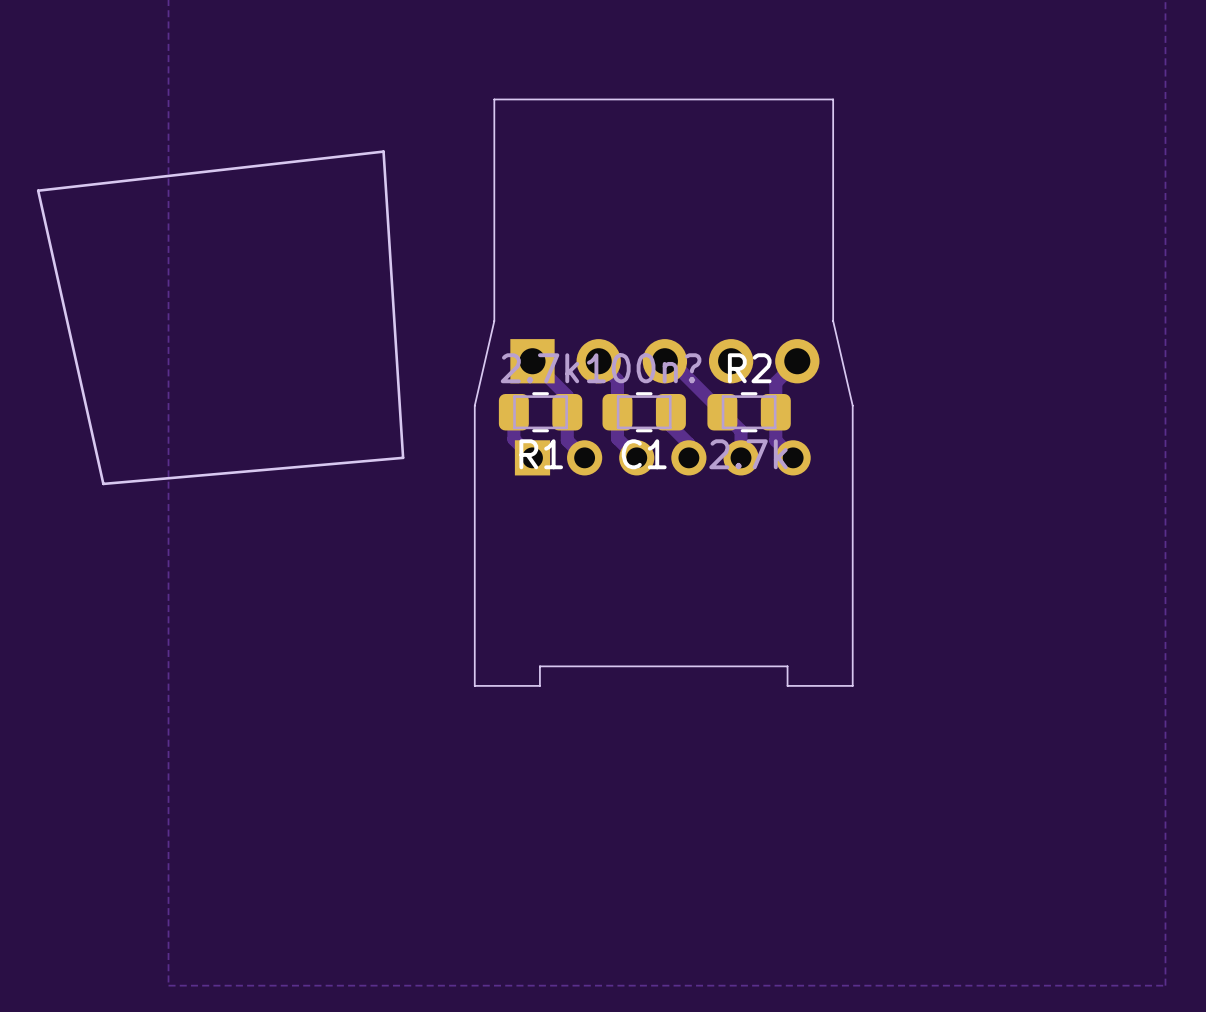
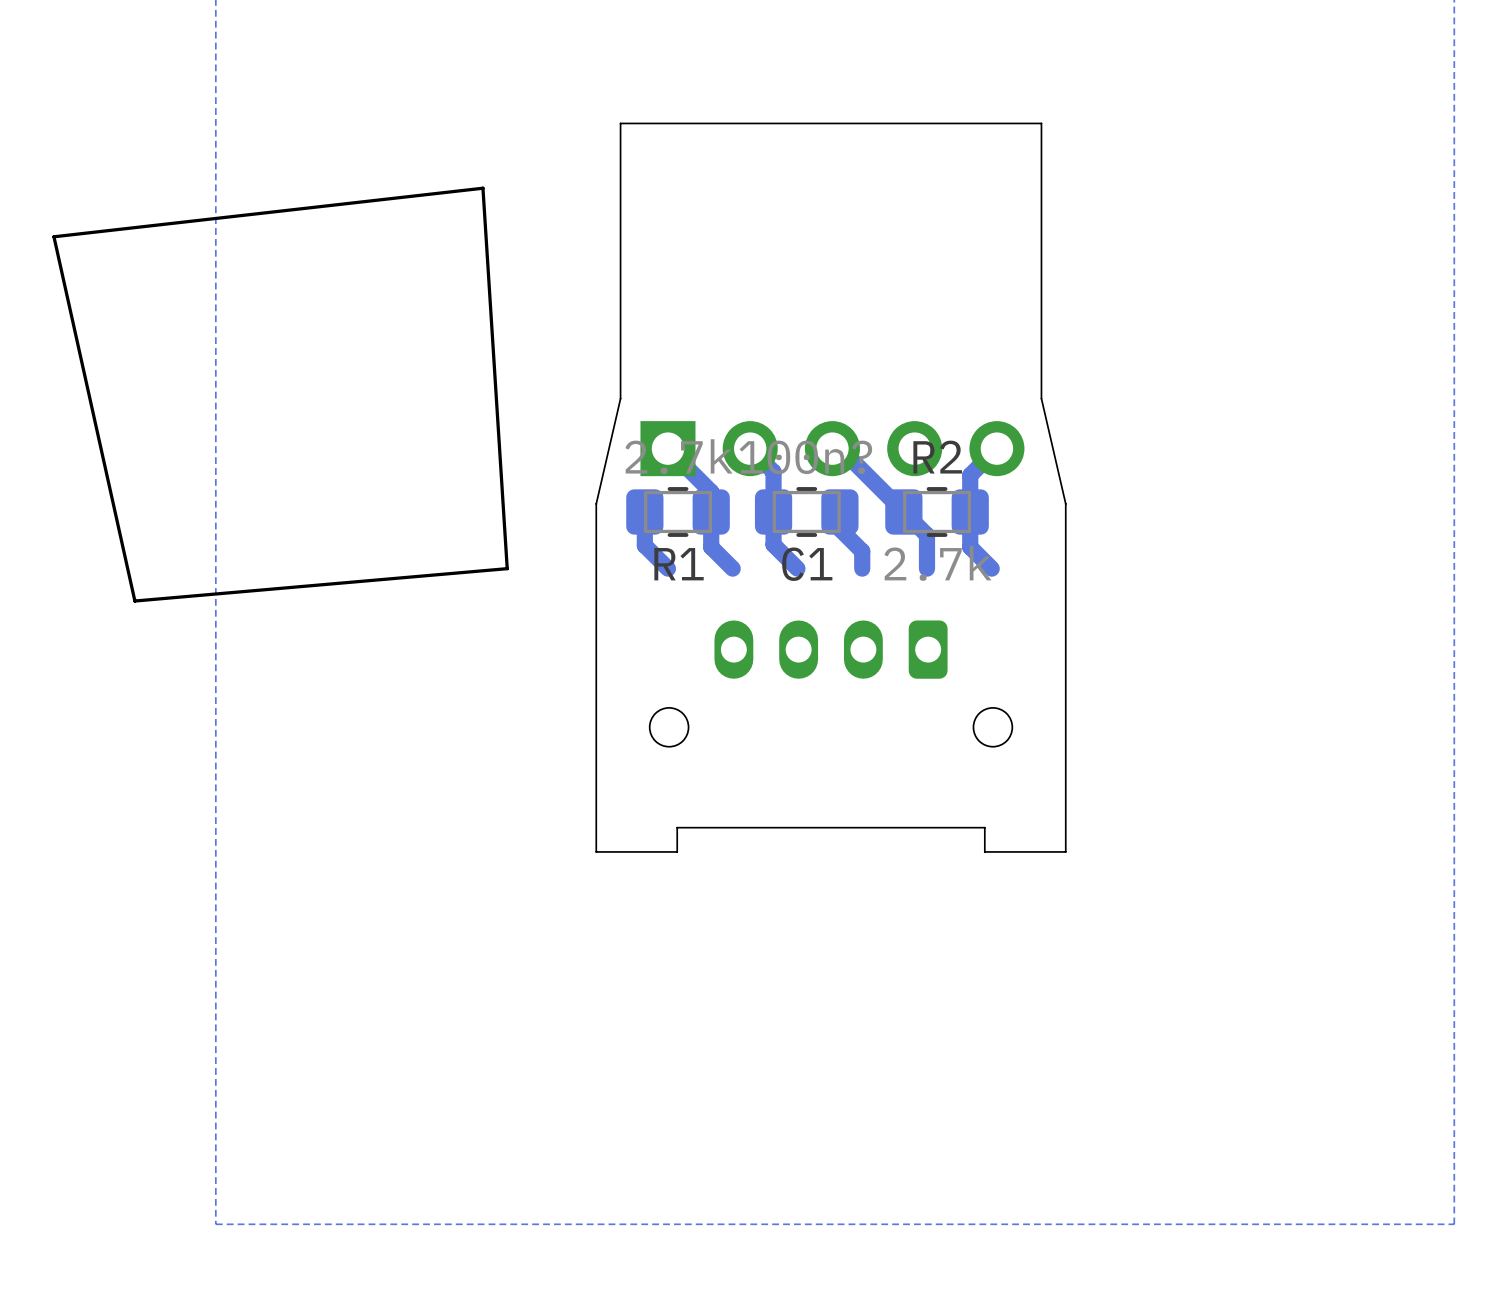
part: (662, 457) -> none
part: none -> (831, 683)

